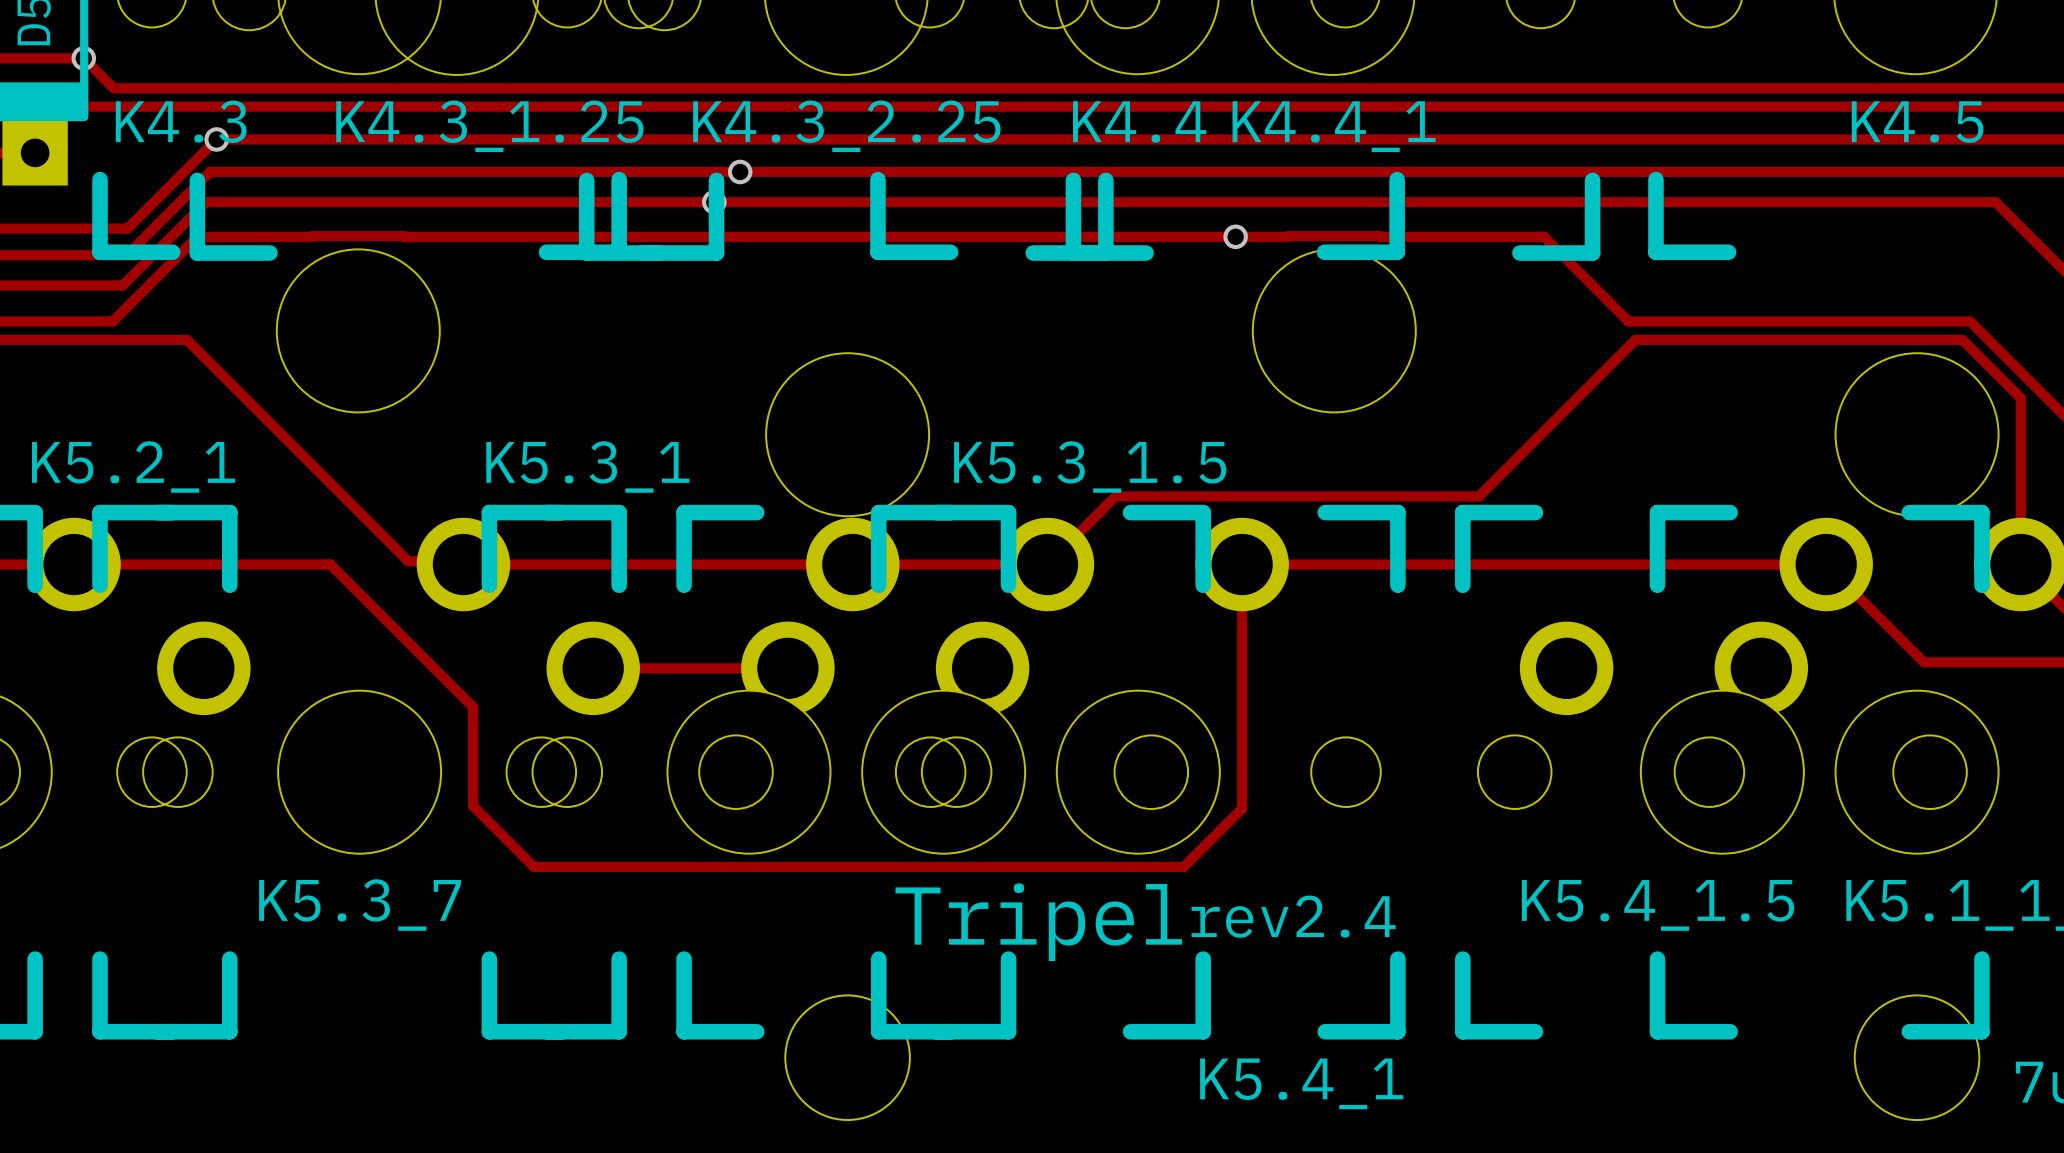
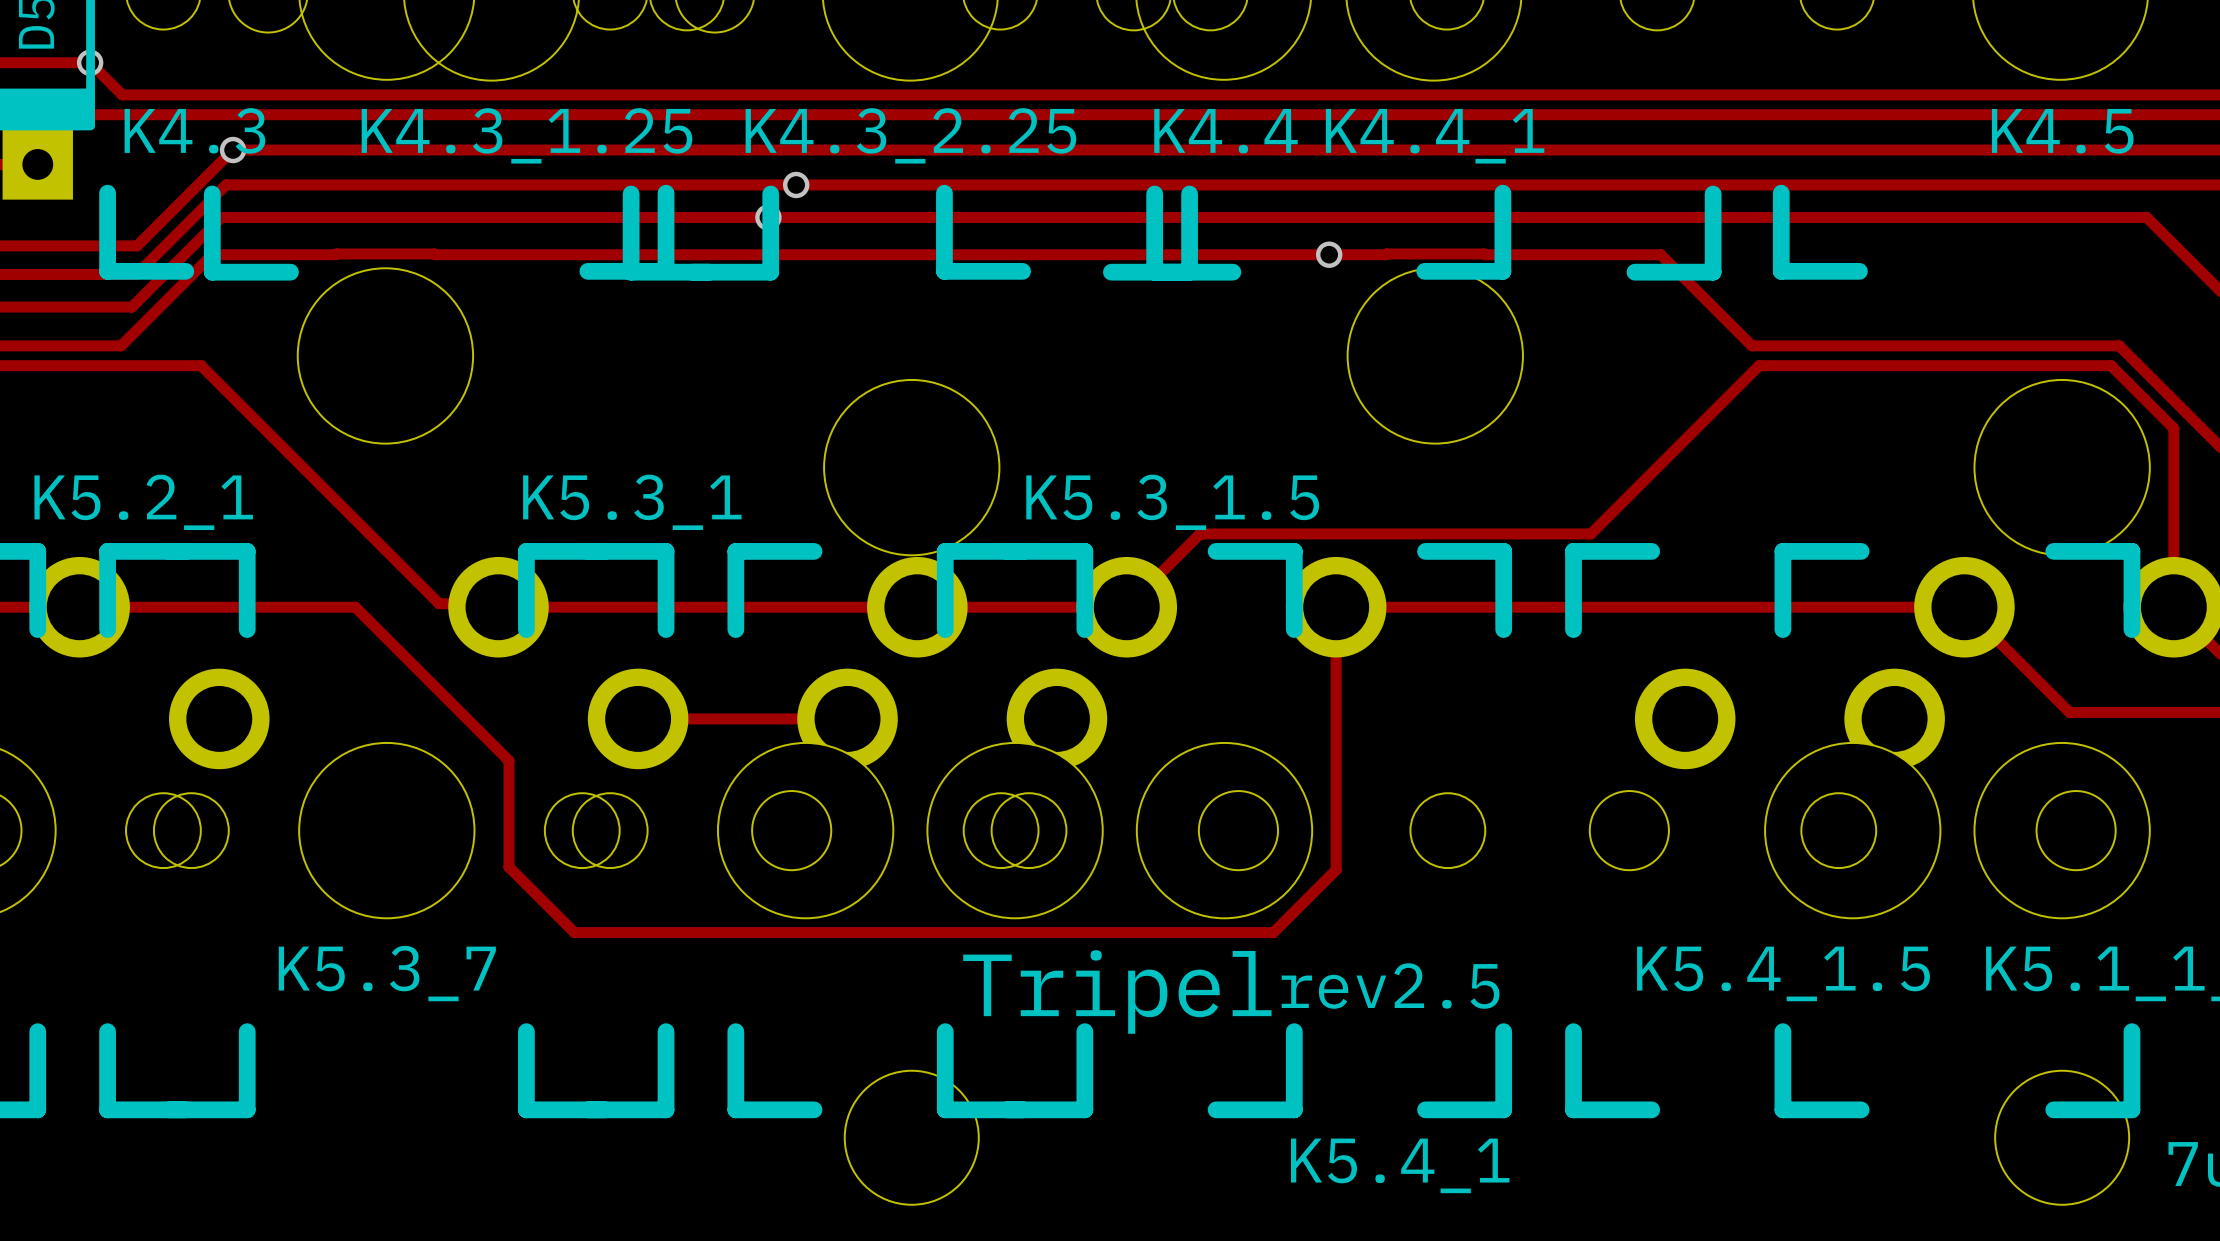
text: rev2.4 (1293, 916) -> rev2.5 (1390, 986)

